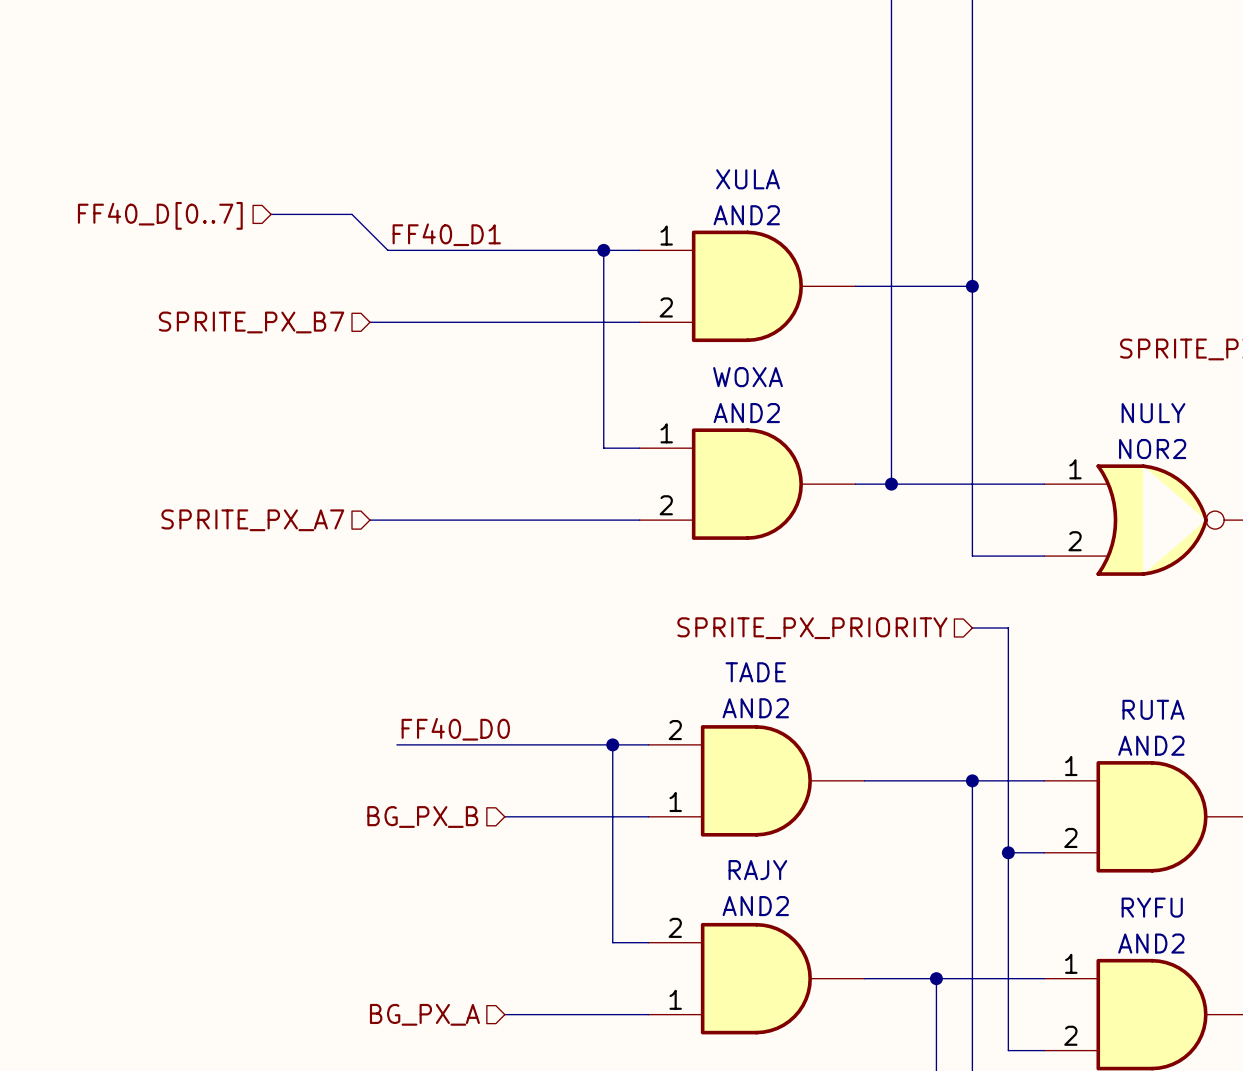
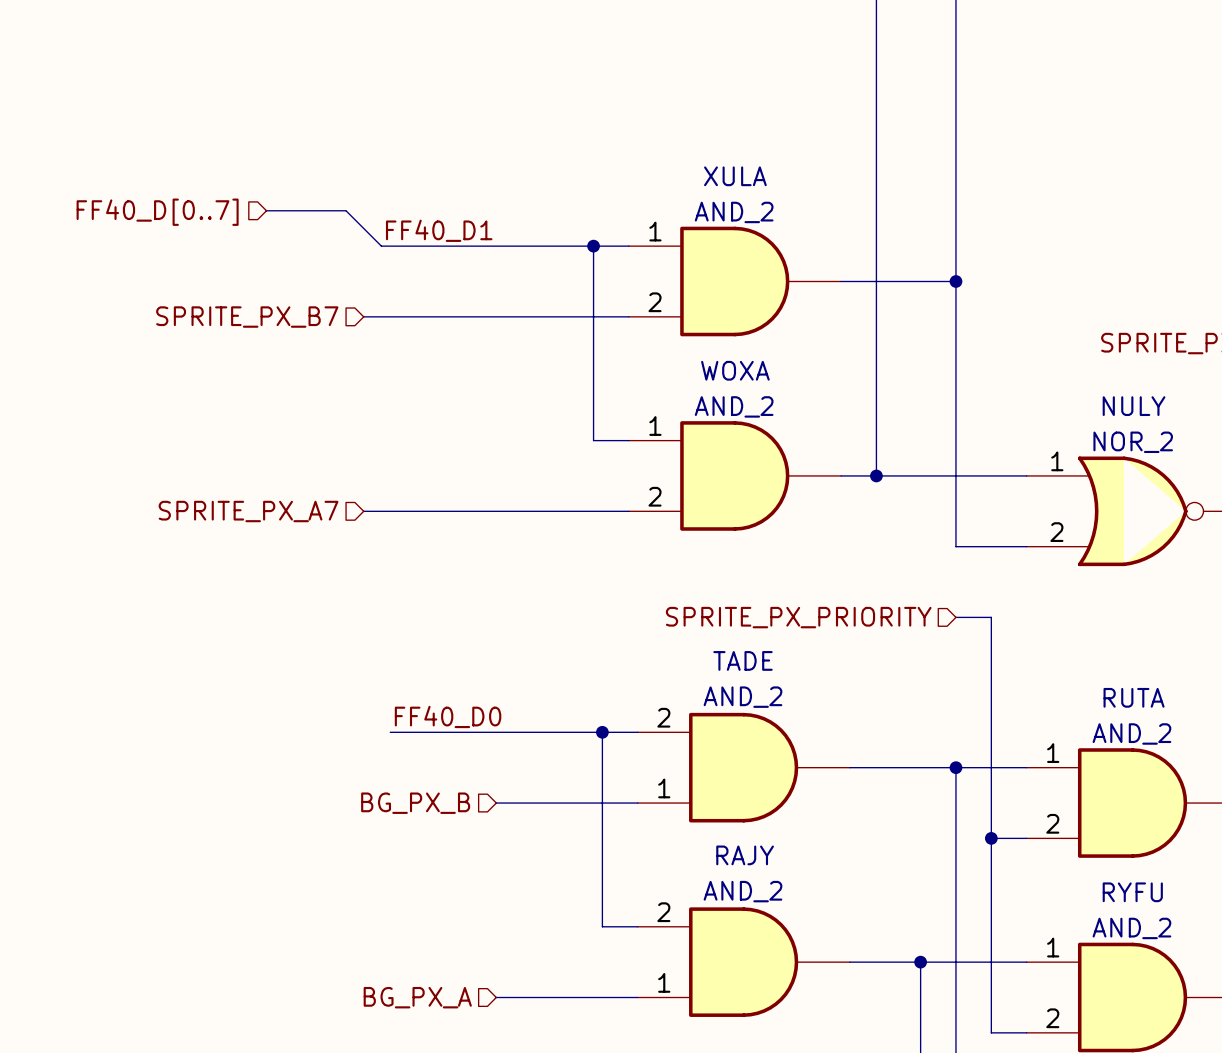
XULA value: AND2 (746, 215) -> AND_2 (734, 212)
WOXA value: AND2 (746, 413) -> AND_2 (734, 406)
NULY value: NOR2 (1152, 449) -> NOR_2 (1133, 442)
TADE value: AND2 (755, 708) -> AND_2 (742, 697)
RUTA value: AND2 (1151, 745) -> AND_2 (1131, 733)
RAJY value: AND2 (755, 906) -> AND_2 (742, 891)
RYFU value: AND2 (1151, 943) -> AND_2 (1131, 928)

